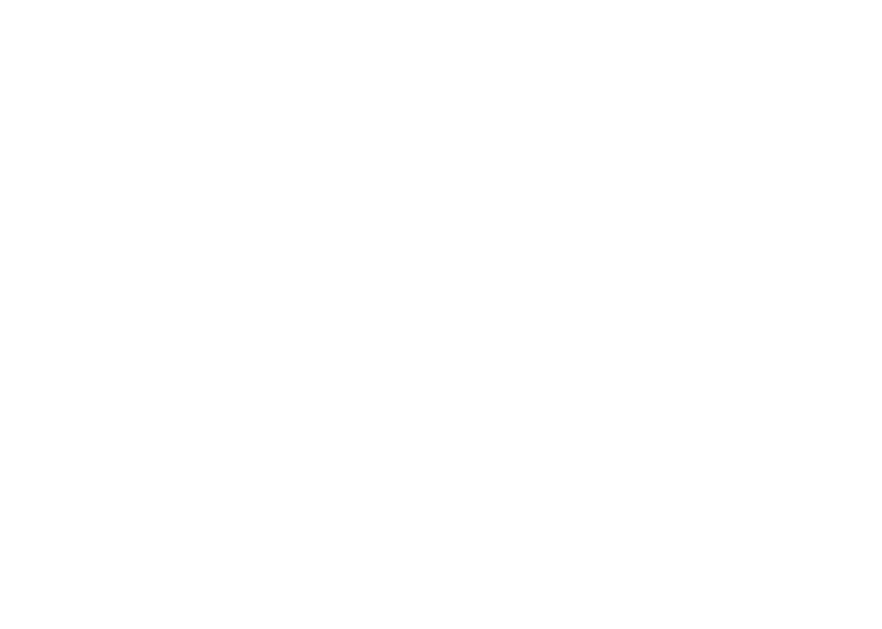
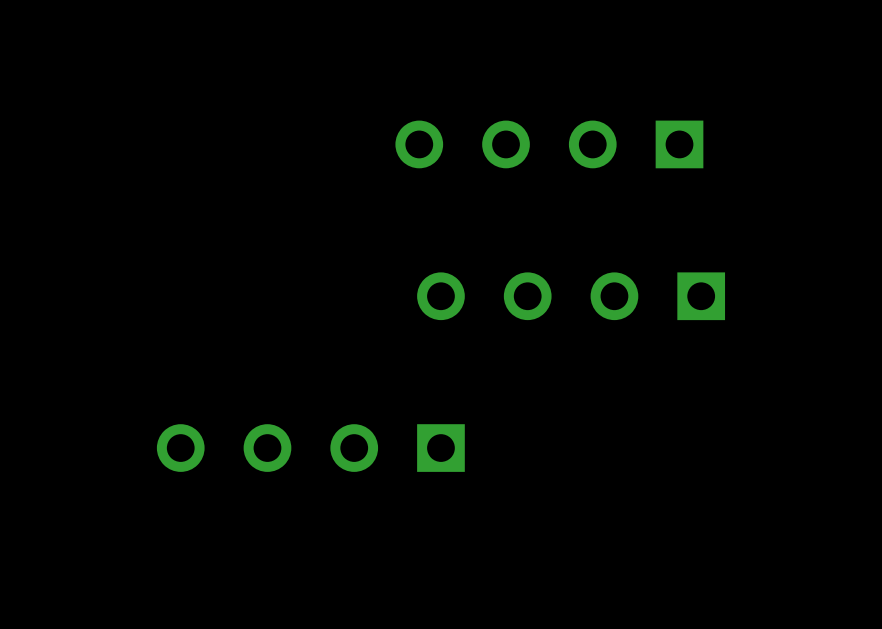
part: none -> (549, 144)
part: none -> (571, 296)
part: none -> (310, 448)

